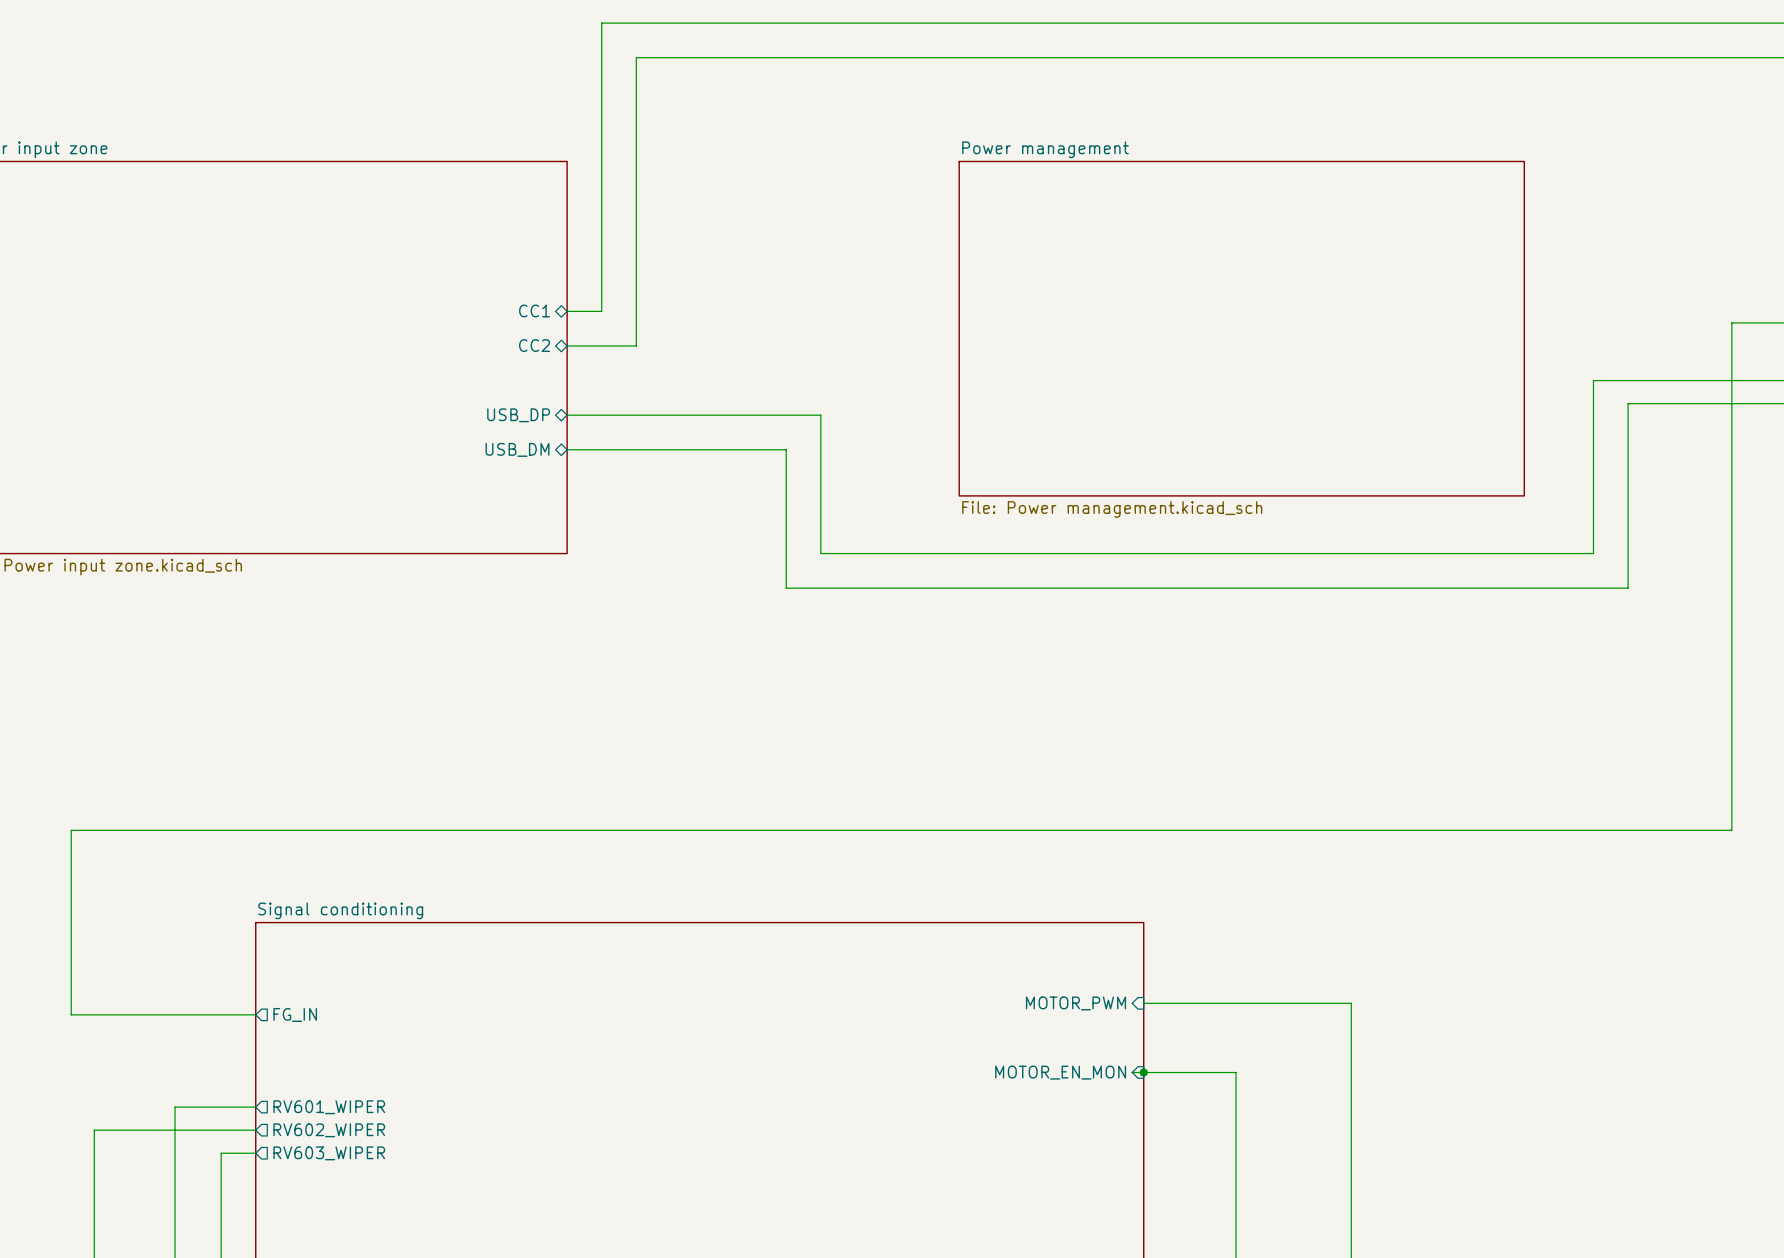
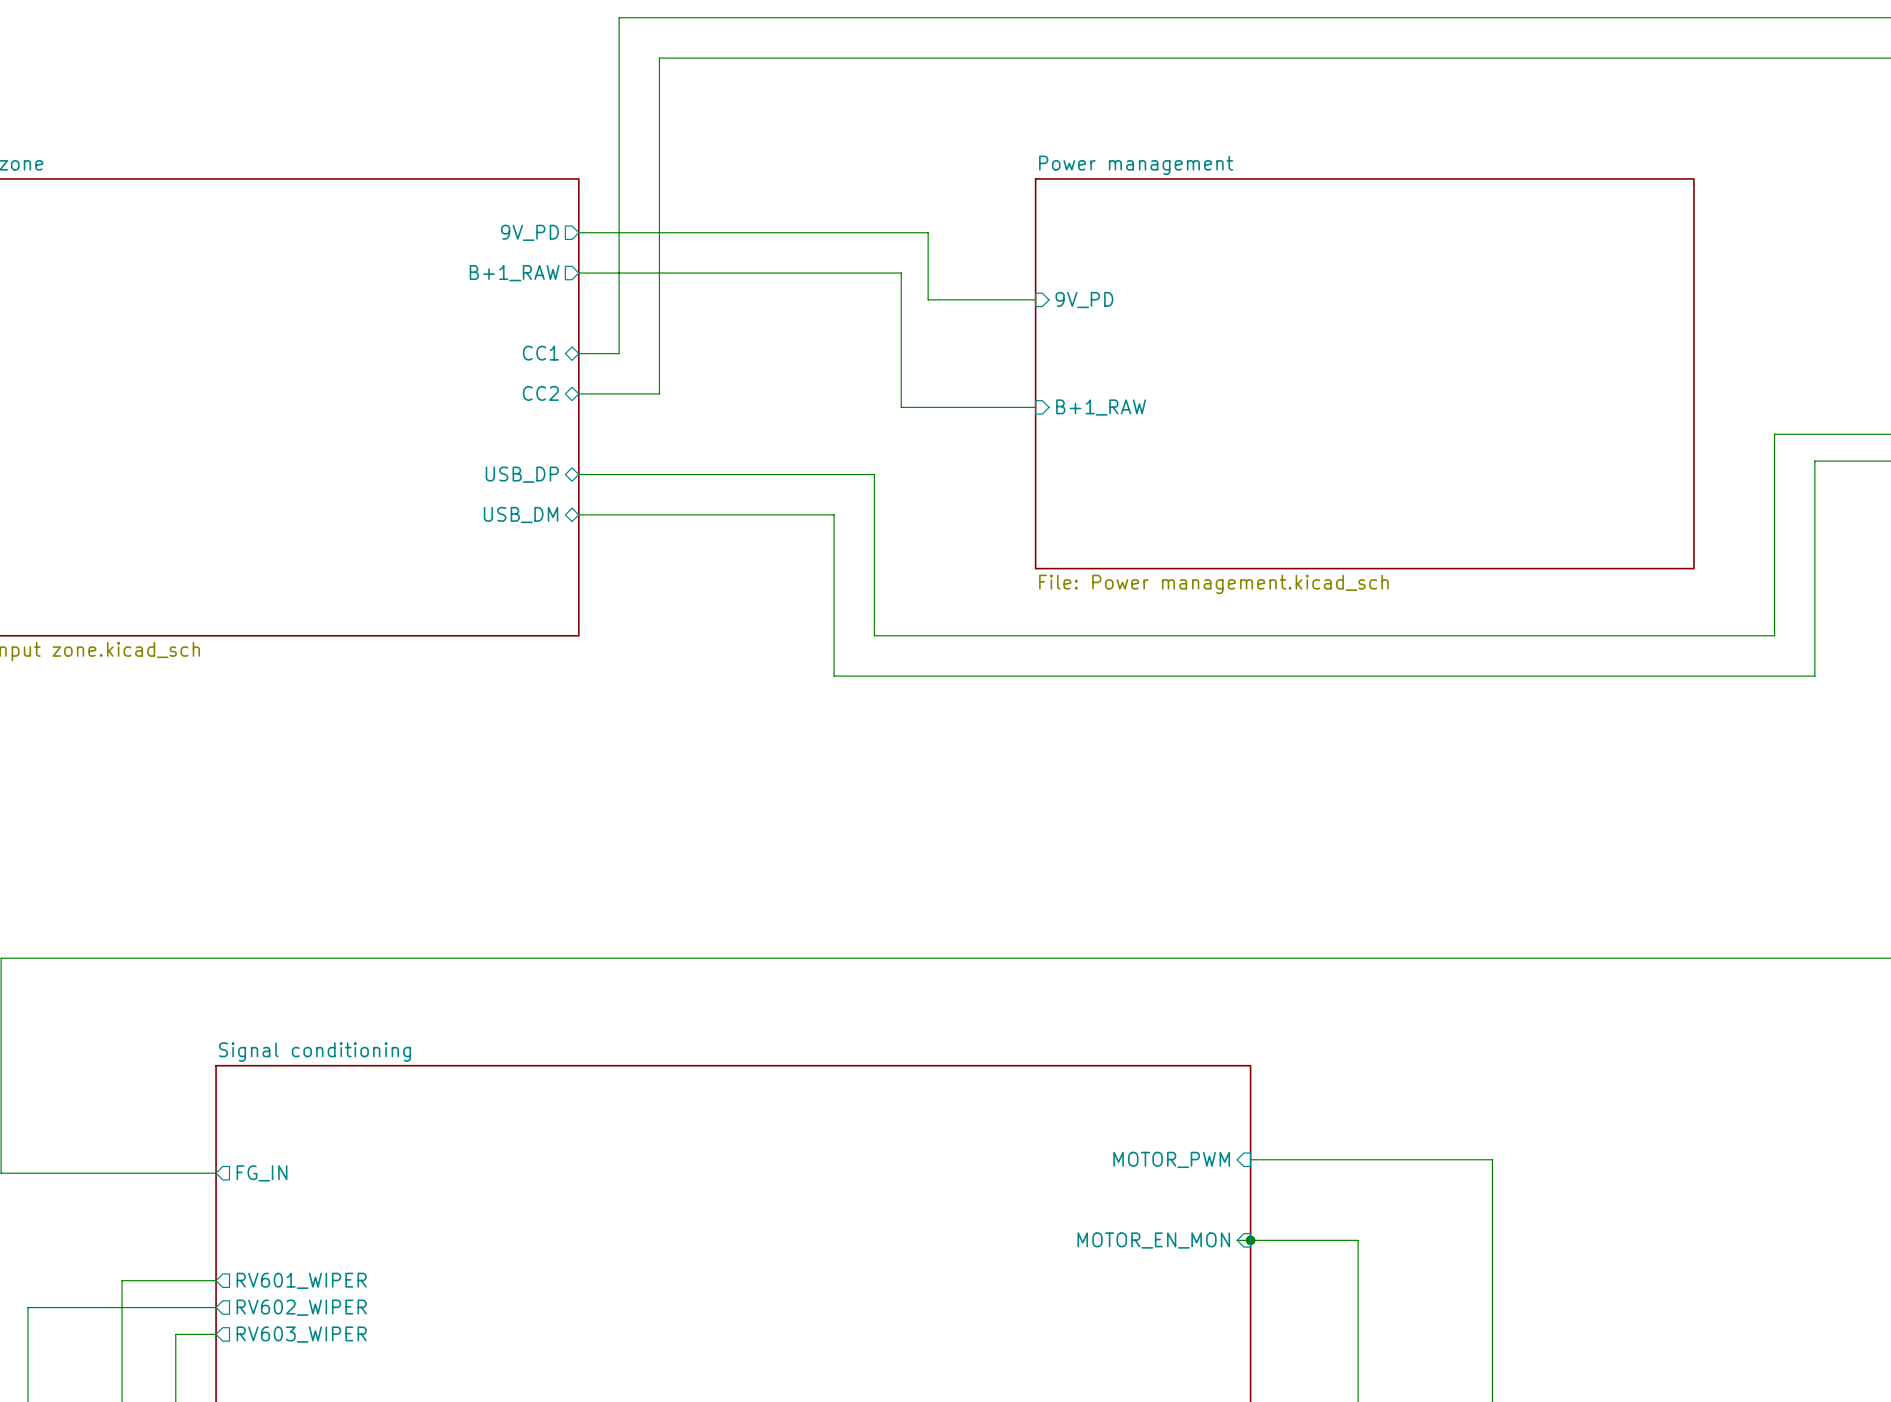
sheet pin: none -> 9V_PD (529, 232)
wire: none -> (578, 232) (928, 232) (928, 299) (1035, 299)
sheet pin: none -> B+1_RAW (514, 273)
wire: none -> (578, 273) (901, 273) (901, 407) (1035, 407)
sheet pin: none -> 9V_PD (1084, 300)
sheet pin: none -> B+1_RAW (1101, 407)

